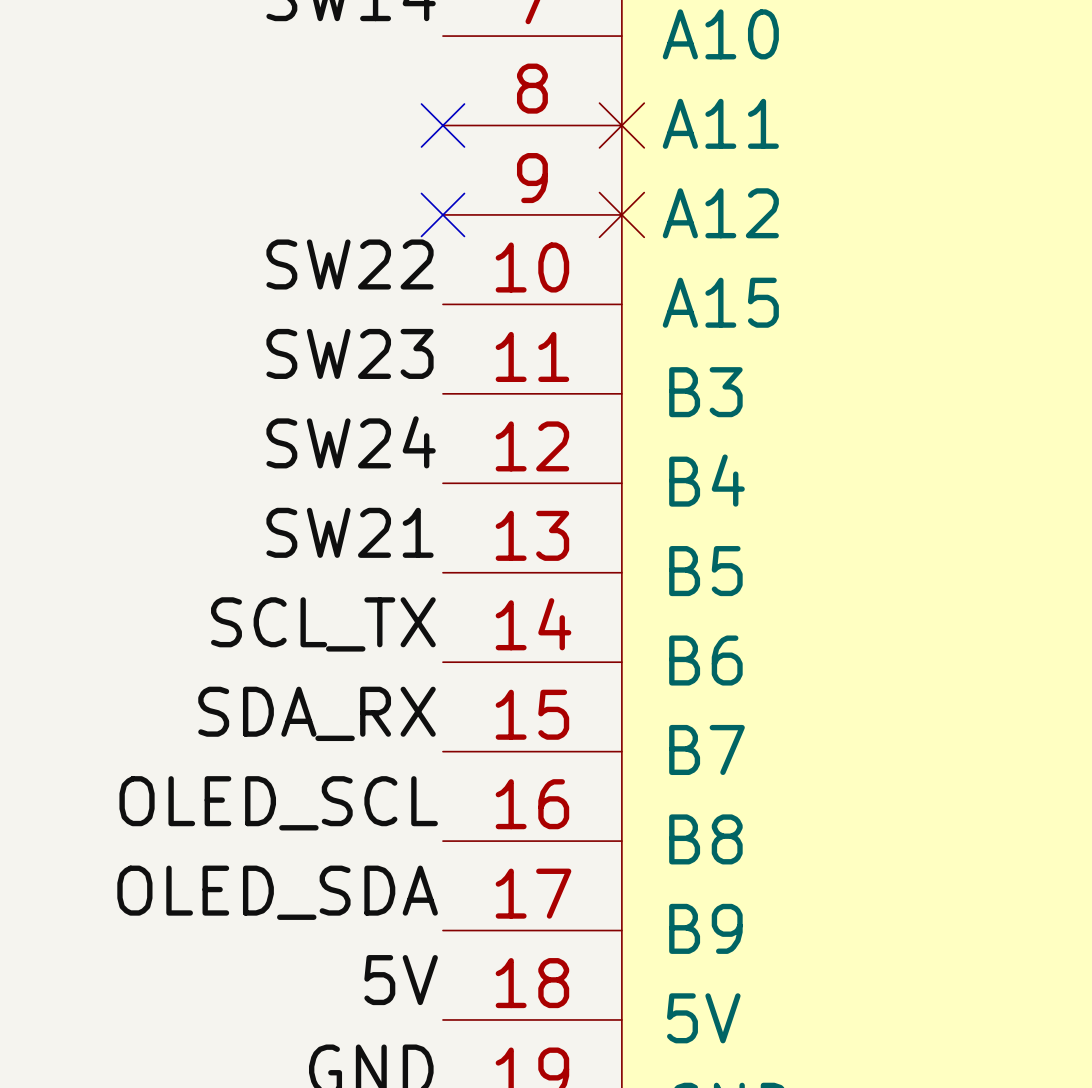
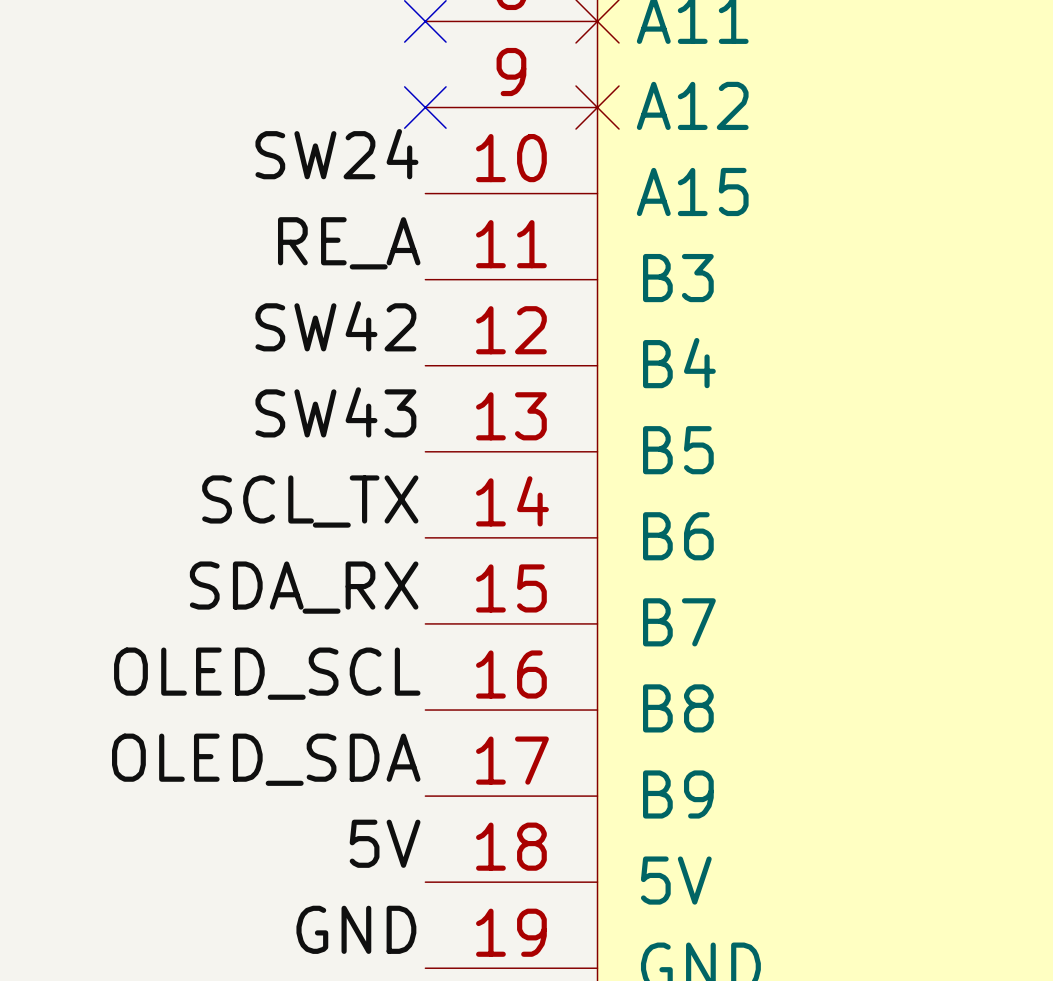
label: SW22 (350, 264) -> SW24 (336, 154)
label: SW23 (350, 353) -> RE_A (349, 243)
label: SW24 (351, 442) -> SW42 (335, 326)
label: SW21 (350, 532) -> SW43 (335, 412)

